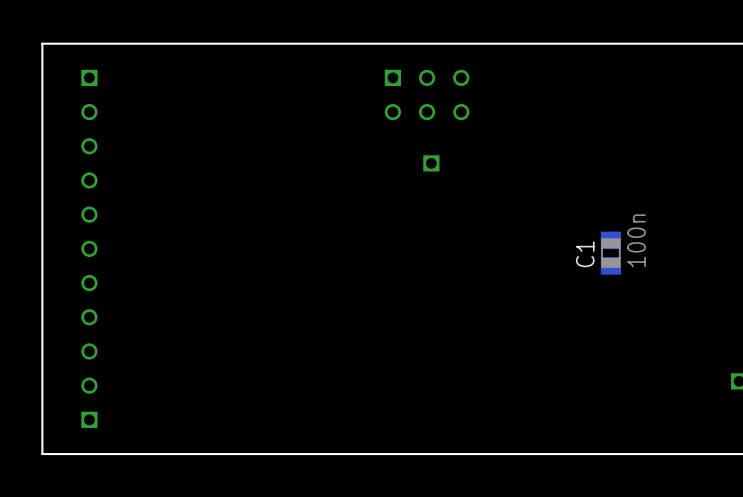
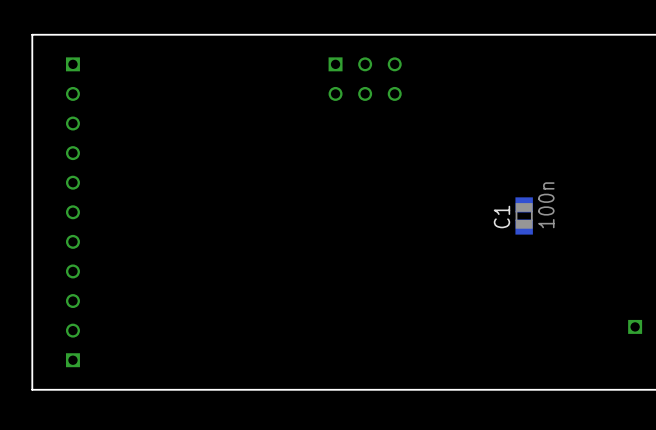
part: (431, 163) -> none

